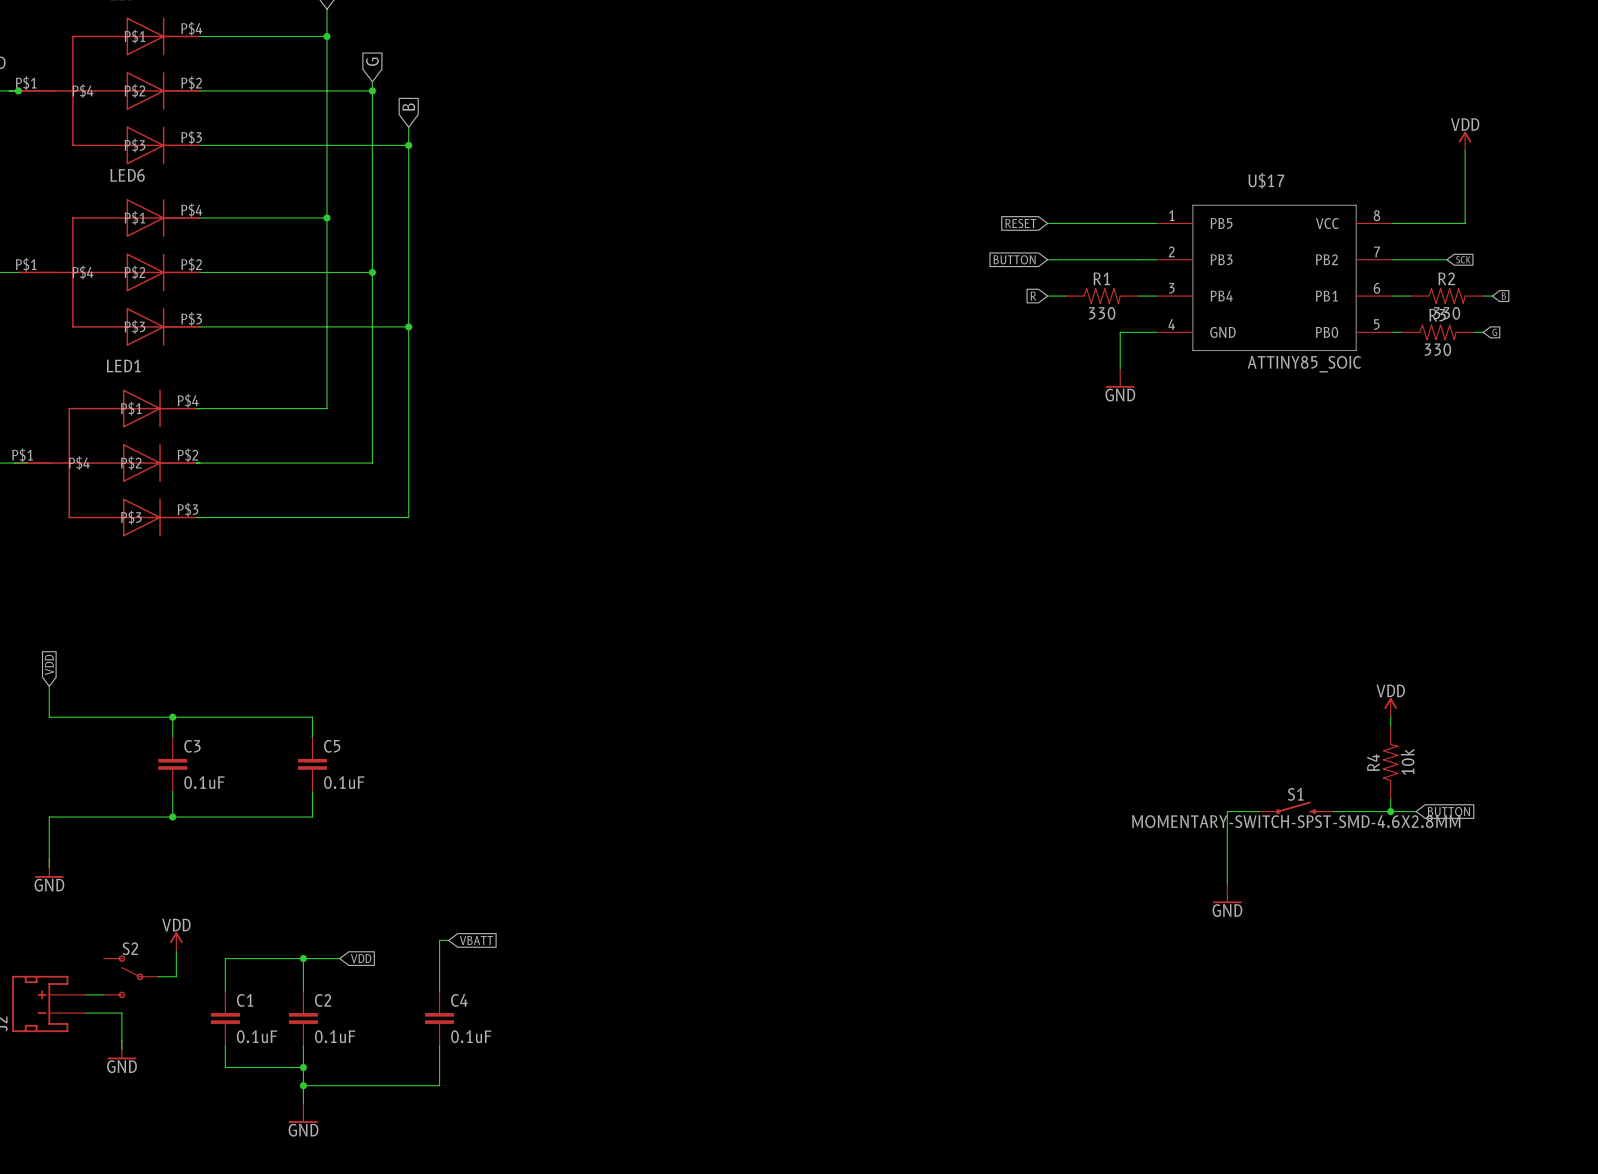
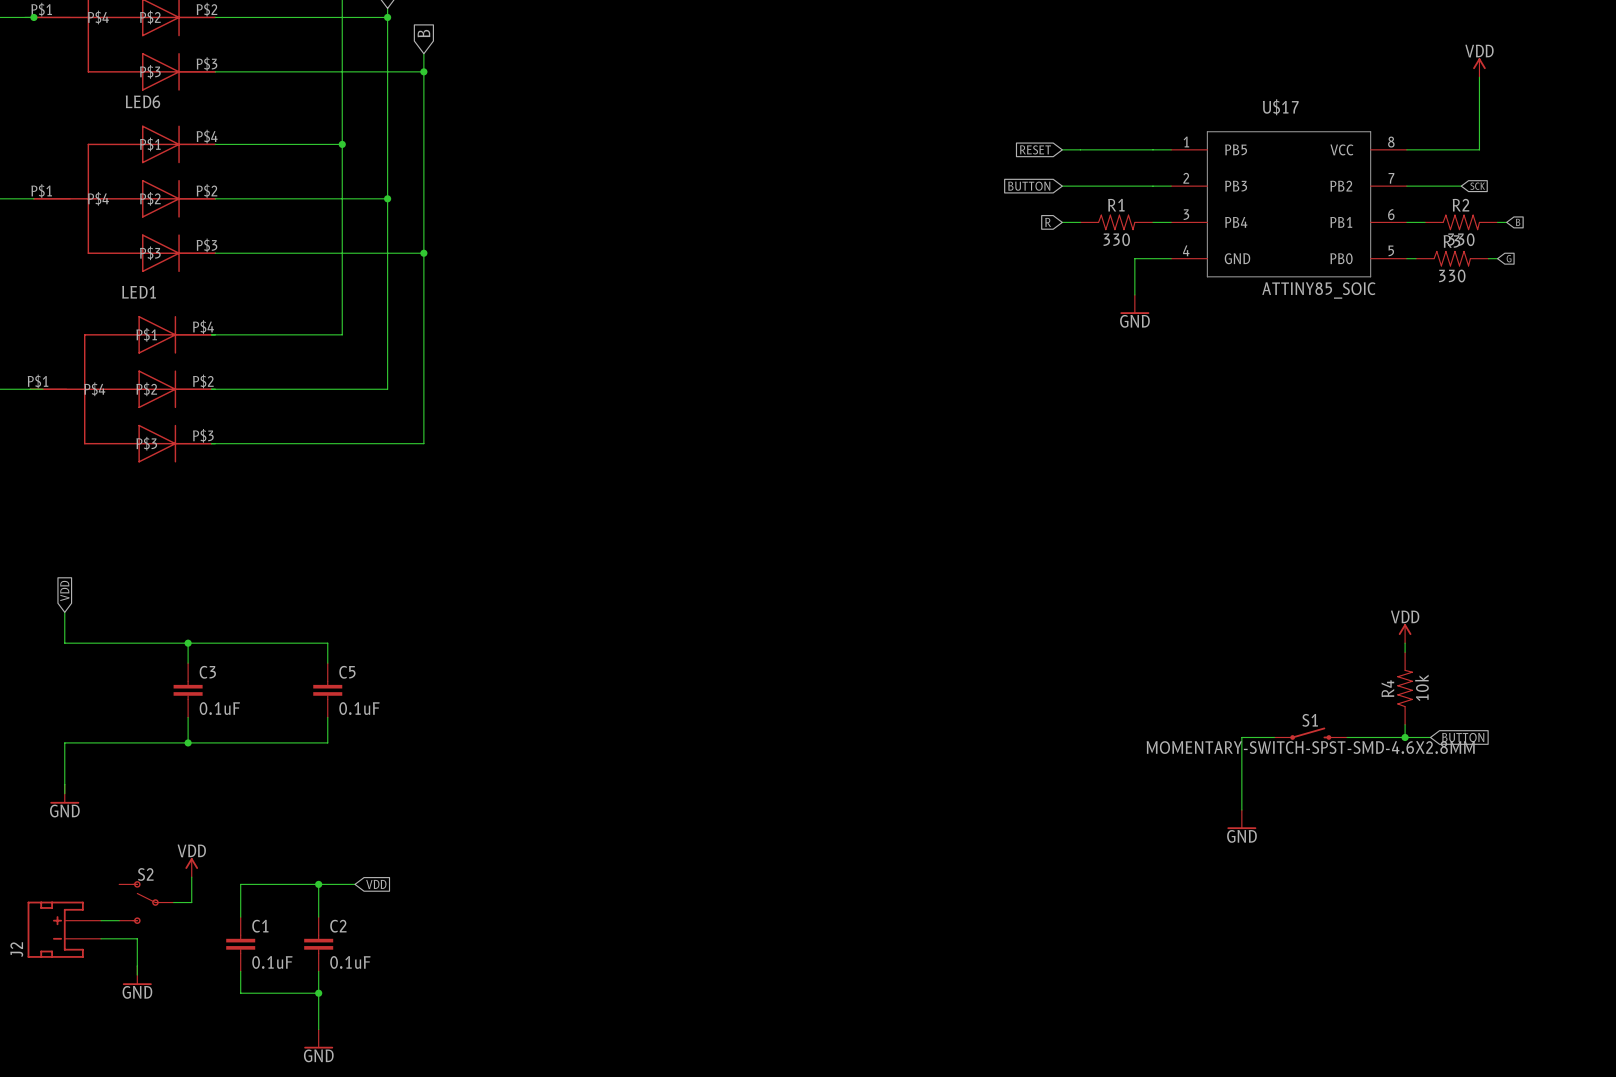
wire: (448, 940) (439, 940) (439, 991) -> none
global label: VBATT (476, 940) -> none
C4: 0.1uF (439, 1018) -> none
wire: (439, 1045) (439, 1085) (303, 1085) -> none
junction: (303, 1085) -> none

